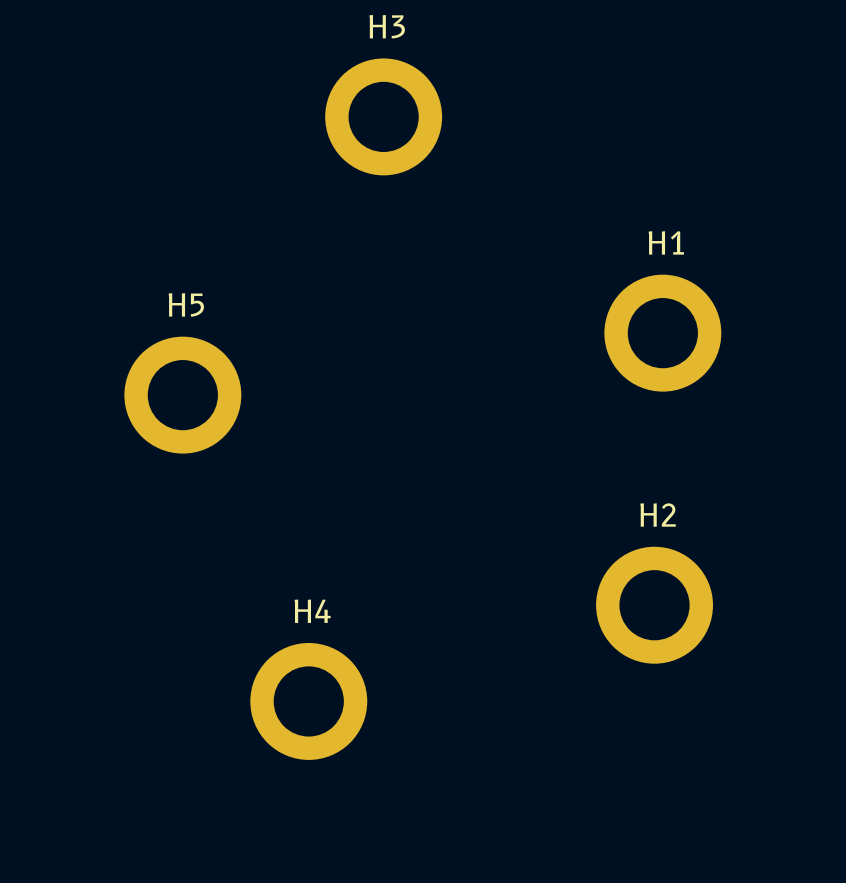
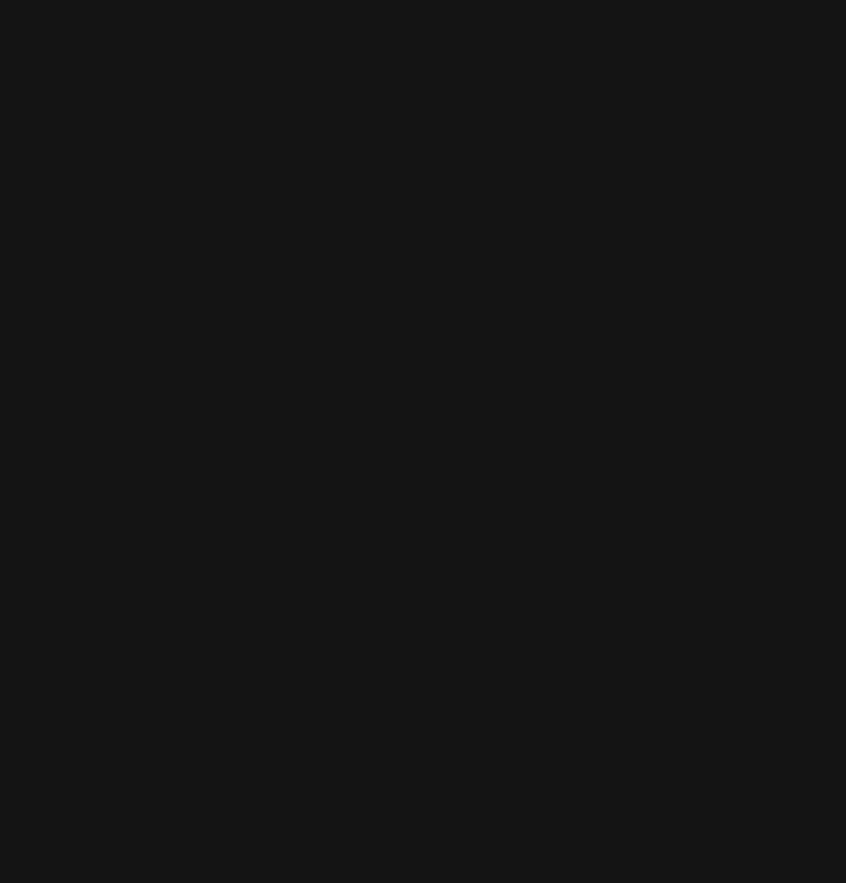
H3: (383, 116) -> none
H1: (662, 333) -> none
H5: (182, 395) -> none
H2: (654, 605) -> none
H4: (308, 701) -> none

